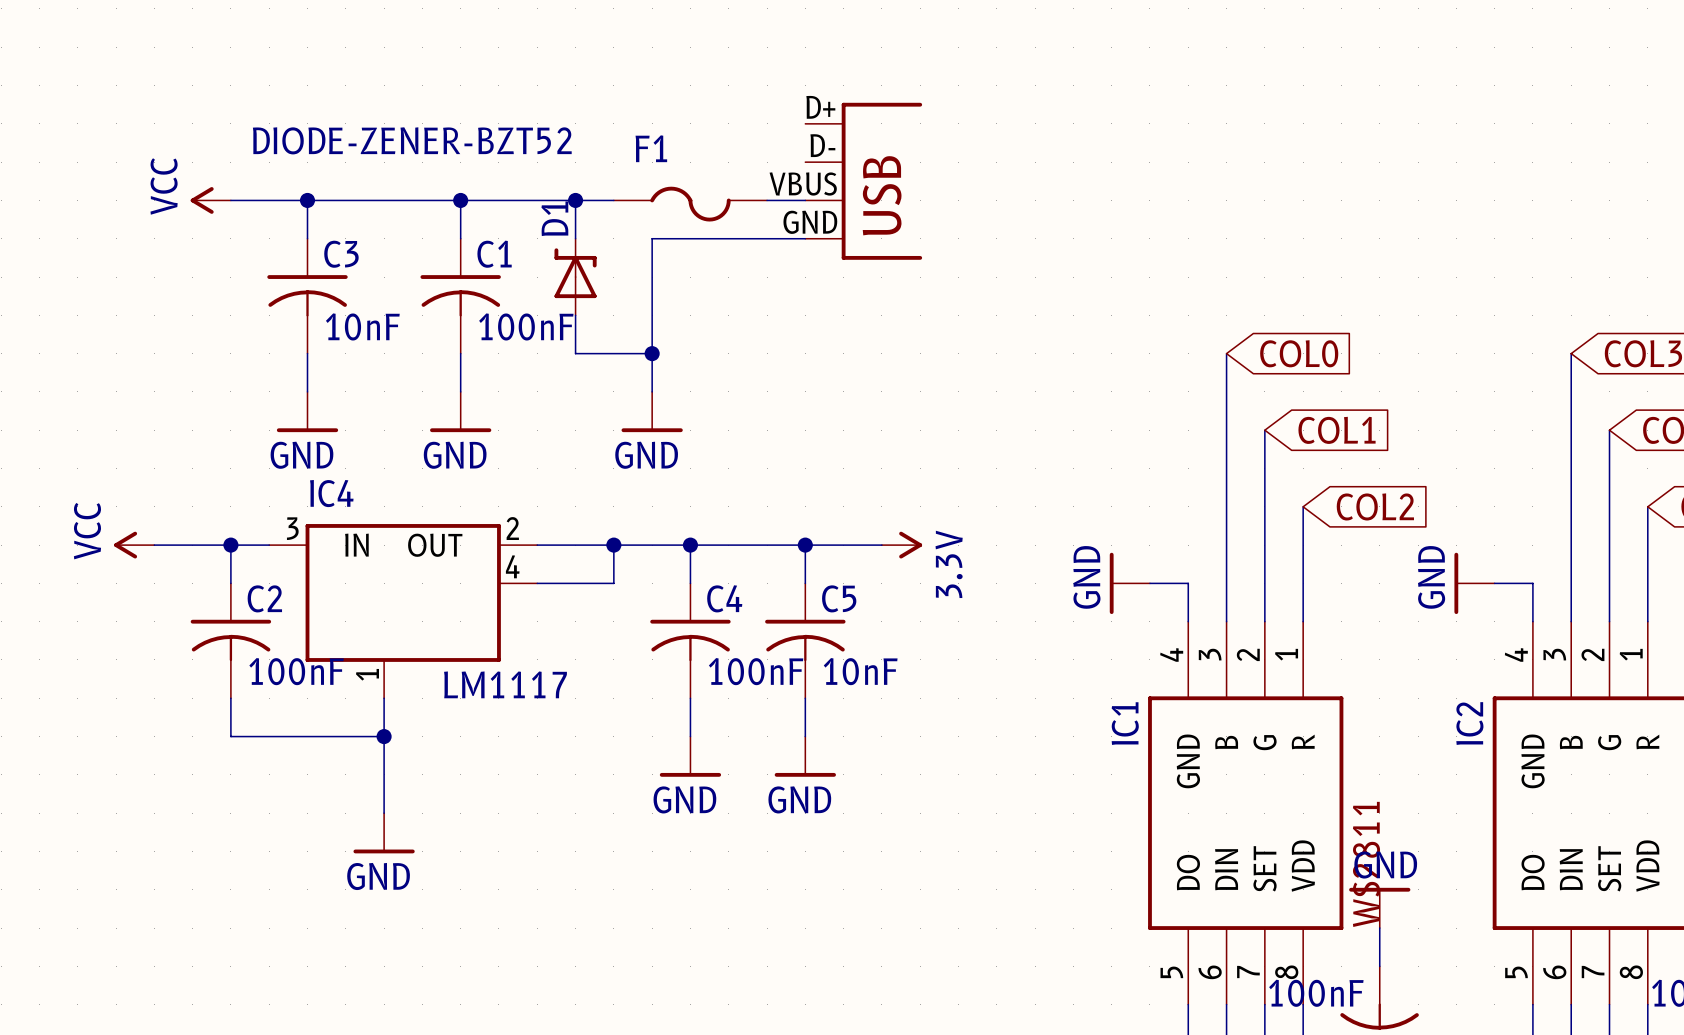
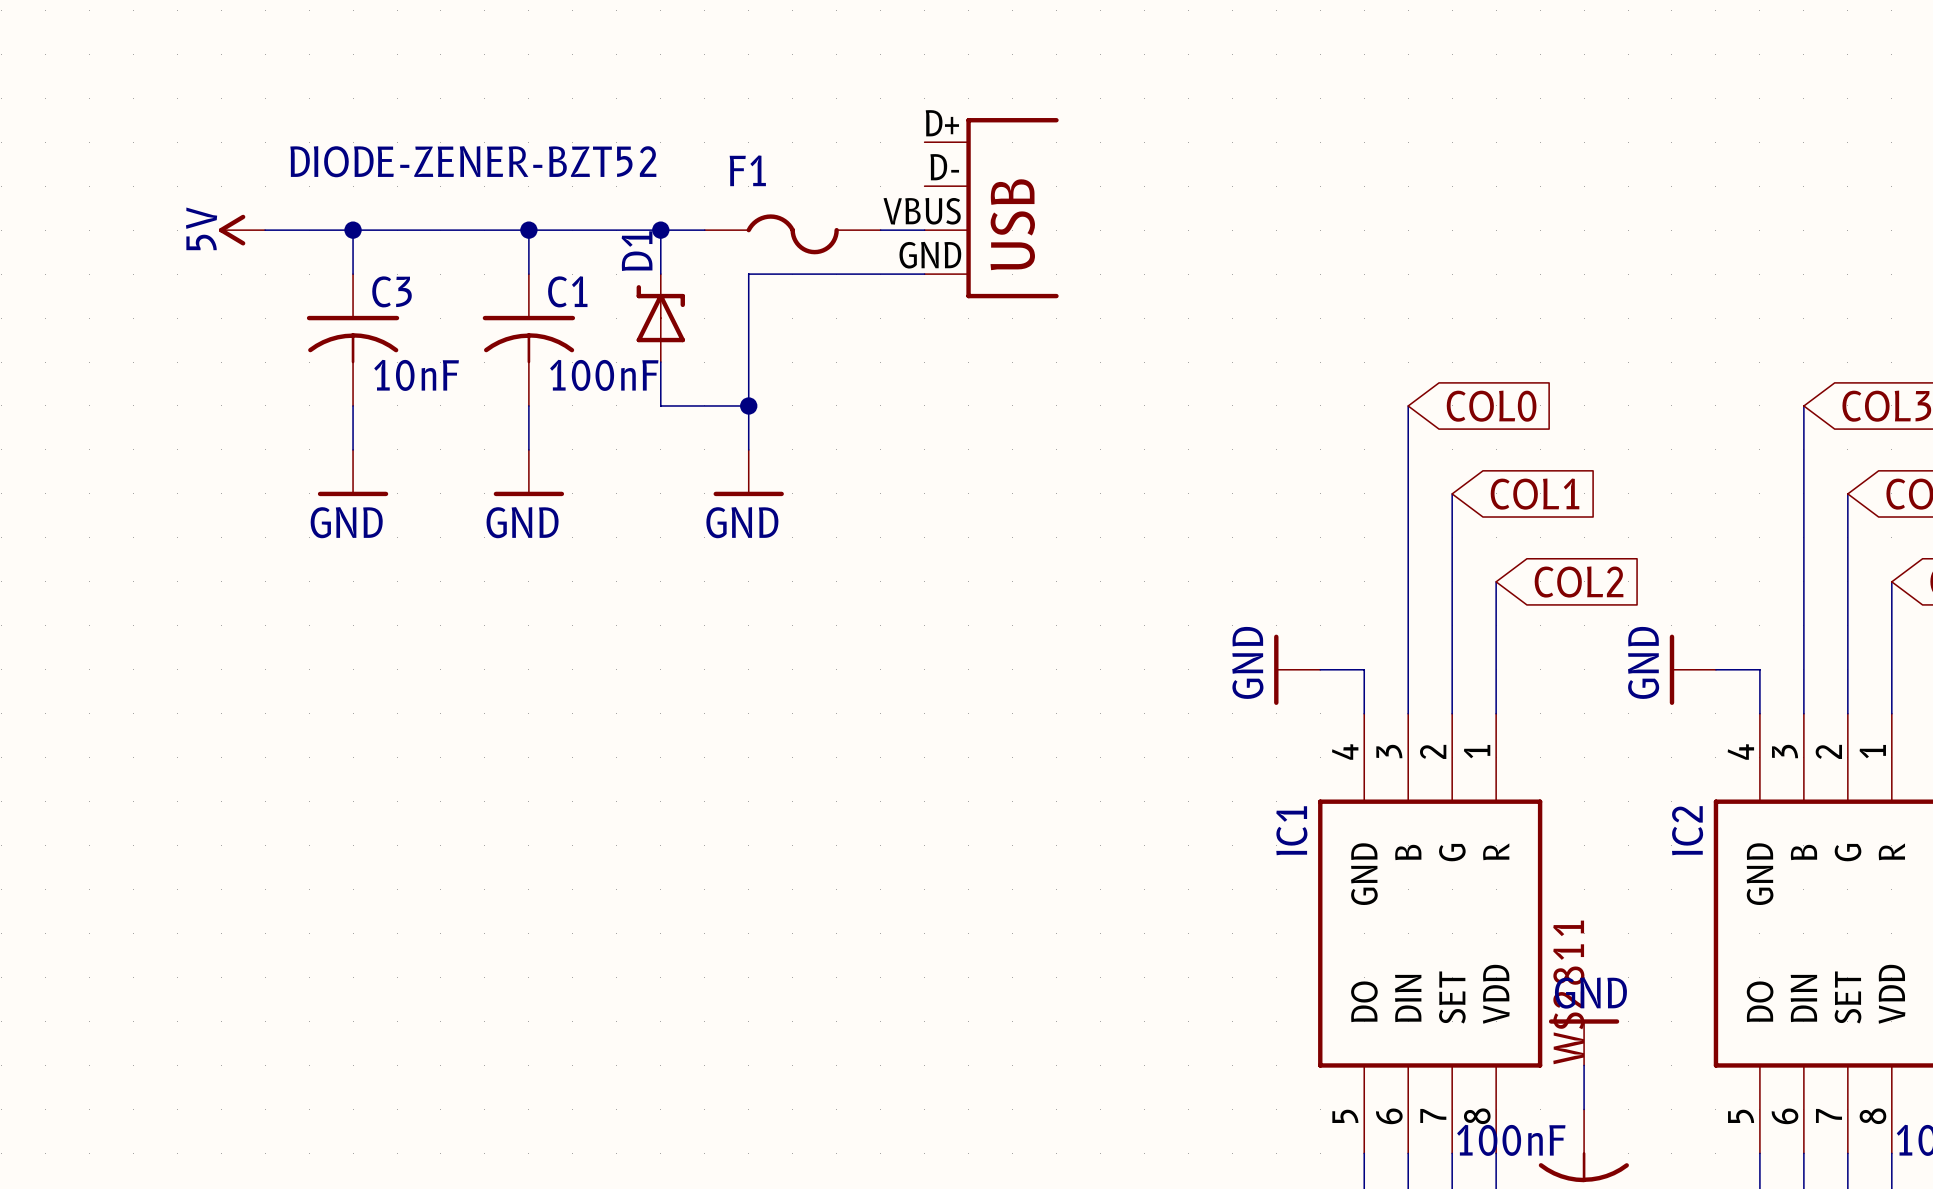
power symbol: VCC (210, 200) -> 5V (242, 230)
power symbol: VCC (134, 545) -> none
wire: (154, 545) (269, 545) -> none
wire: (230, 545) (230, 583) -> none
junction: (230, 545) -> none
wire: (537, 545) (881, 545) -> none
wire: (613, 545) (613, 583) (537, 583) -> none
junction: (613, 545) -> none
wire: (690, 545) (690, 583) -> none
junction: (690, 545) -> none
wire: (805, 545) (805, 583) -> none
junction: (805, 545) -> none
power symbol: 3.3V (902, 545) -> none
IC4: LM1117 (403, 611) -> none
C2: 100nF (230, 640) -> none
C4: 100nF (690, 640) -> none
C5: 10nF (805, 640) -> none
wire: (230, 698) (230, 736) (384, 736) -> none
wire: (384, 698) (384, 813) -> none
wire: (690, 698) (690, 736) -> none
wire: (805, 698) (805, 736) -> none
junction: (384, 736) -> none
power symbol: GND (690, 756) -> none
power symbol: GND (805, 756) -> none
power symbol: GND (384, 833) -> none

